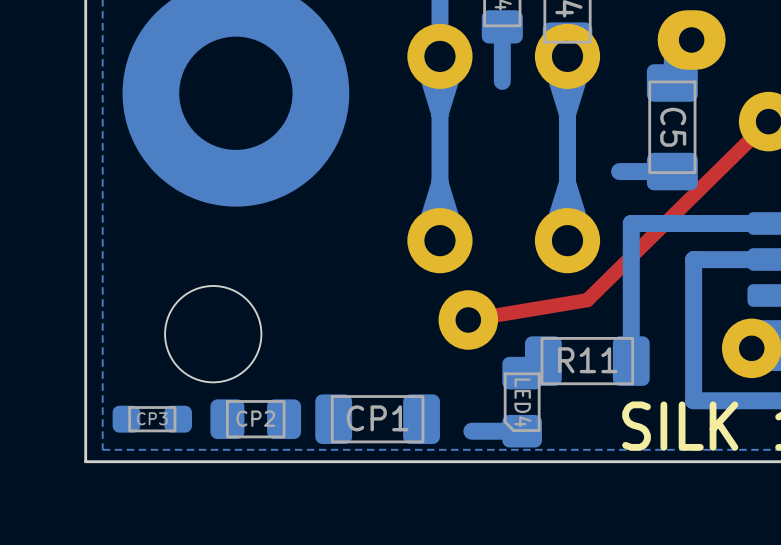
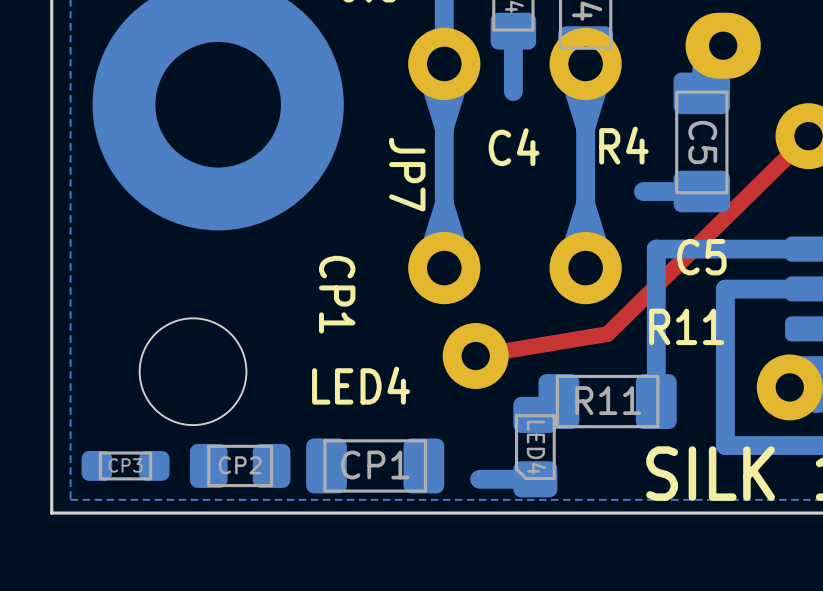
text: none -> R4 (623, 145)
text: none -> C4 (514, 147)
text: none -> JP7 (407, 174)
text: none -> C5 (701, 257)
text: none -> CP1 (337, 294)
text: none -> R11 (686, 326)
text: none -> LED4 (361, 385)

